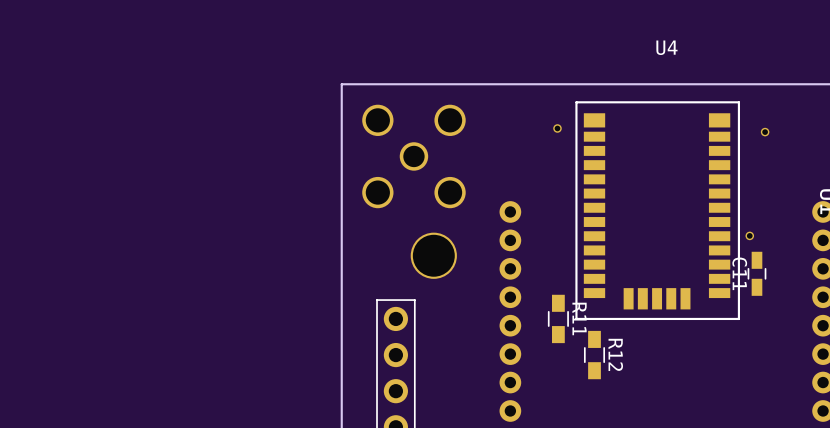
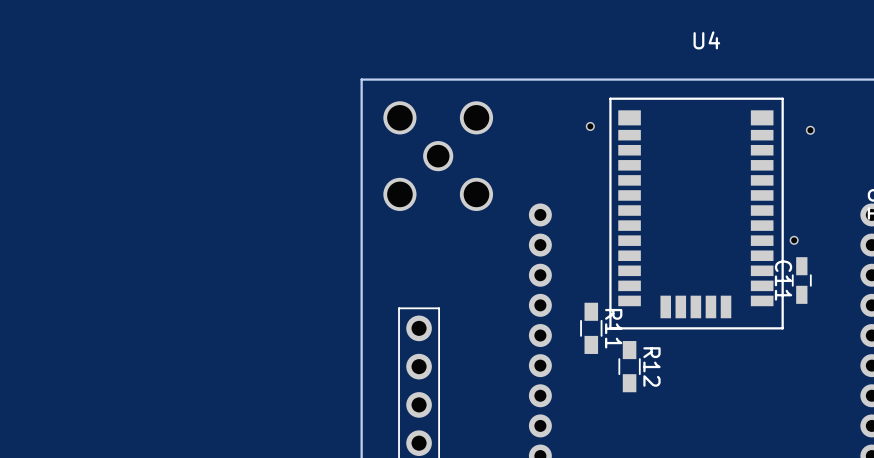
part: (433, 255) -> none

